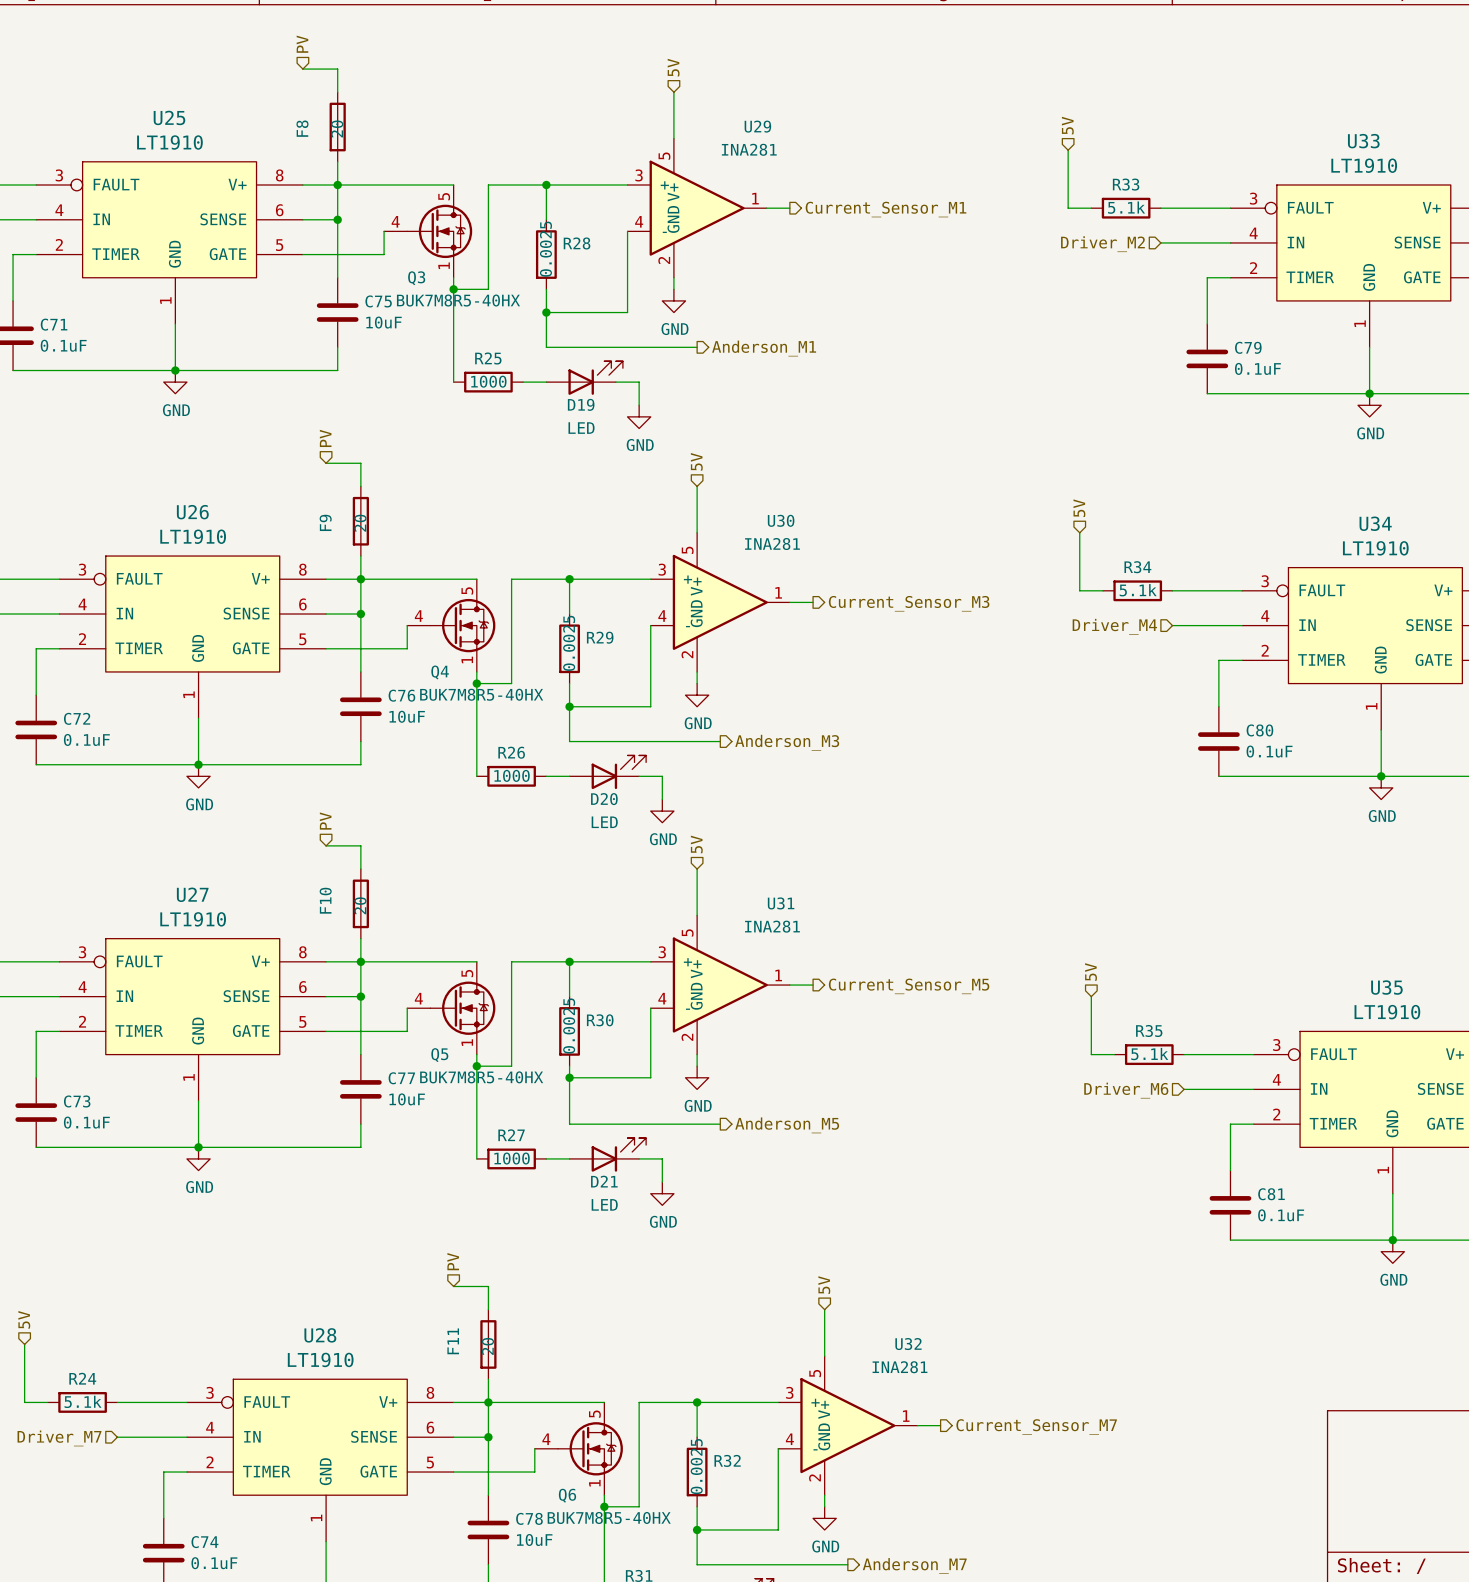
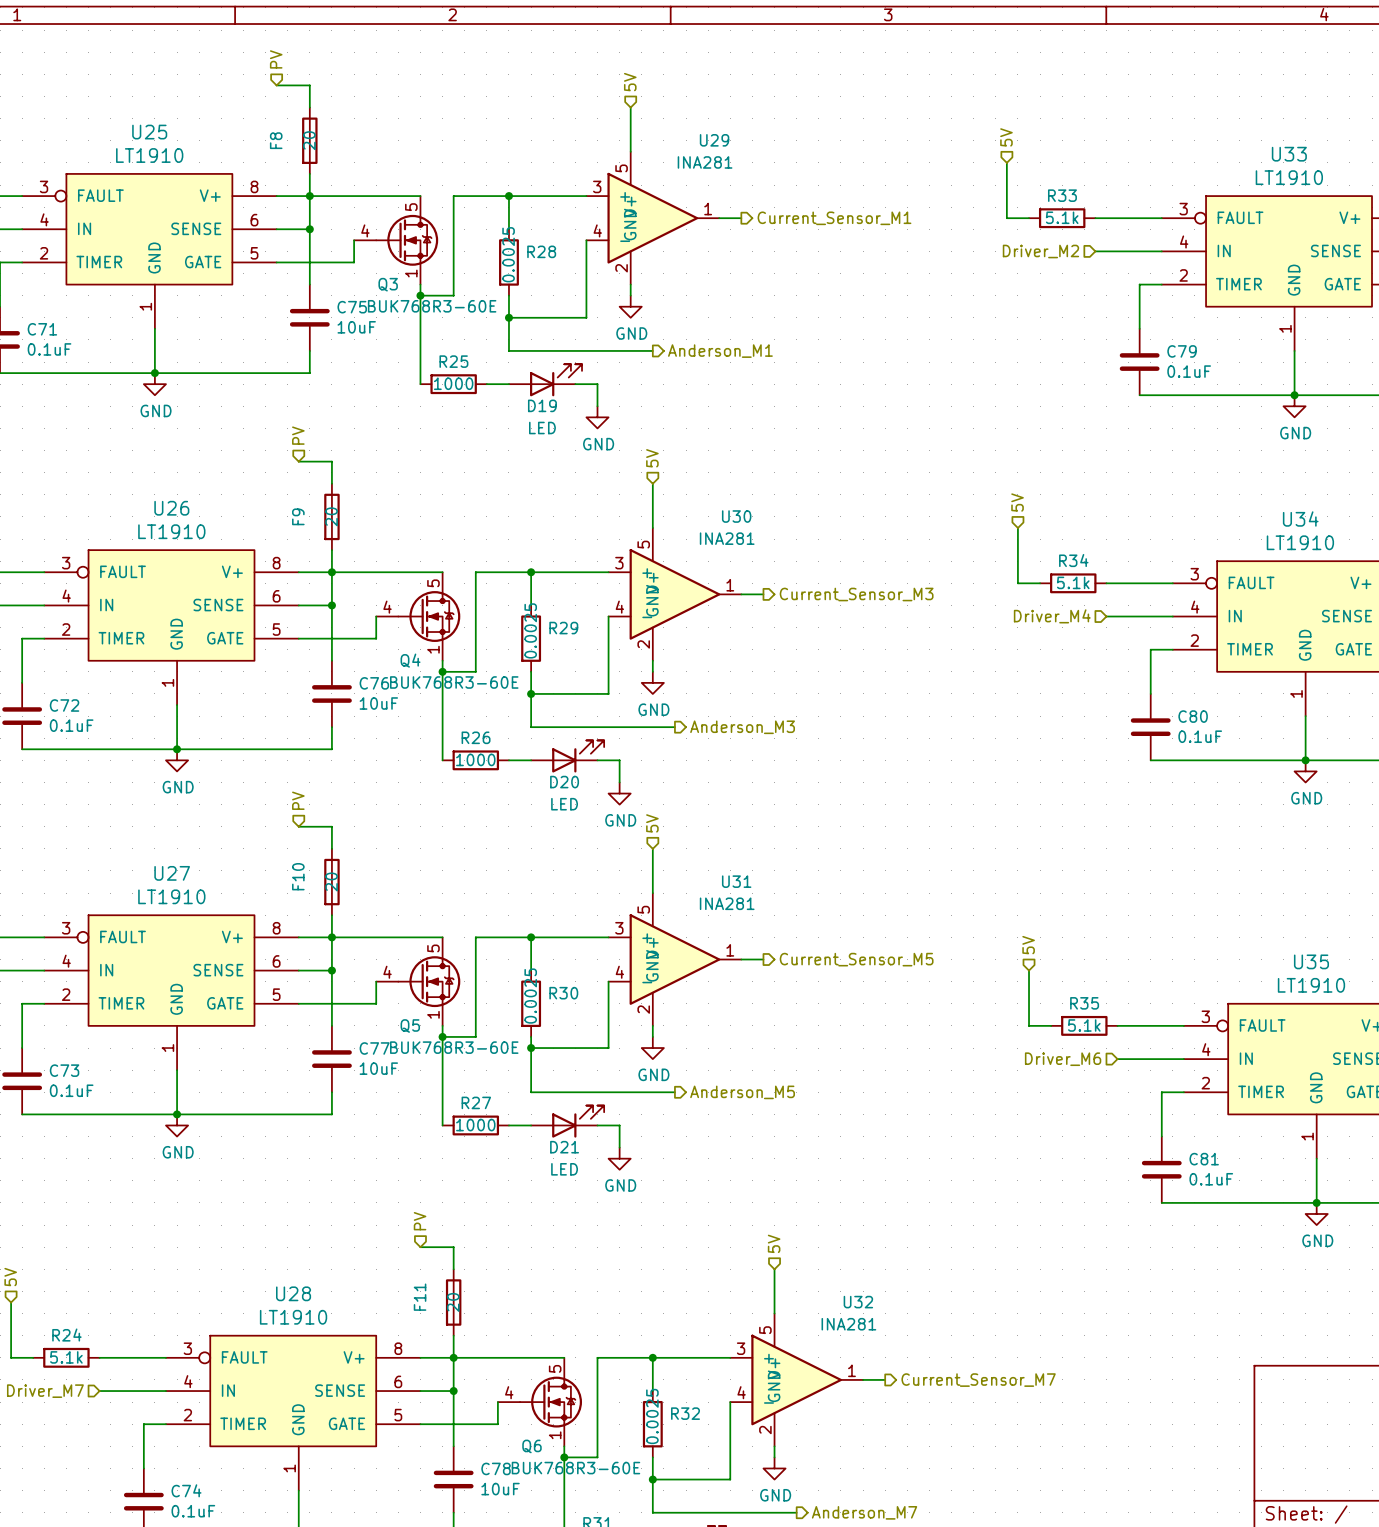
Q3 value: BUK7M8R5-40HX (458, 300) -> BUK768R3-60E (432, 306)
Q4 value: BUK7M8R5-40HX (481, 694) -> BUK768R3-60E (454, 682)
Q5 value: BUK7M8R5-40HX (481, 1077) -> BUK768R3-60E (454, 1047)
Q6 value: BUK7M8R5-40HX (609, 1517) -> BUK768R3-60E (575, 1468)

